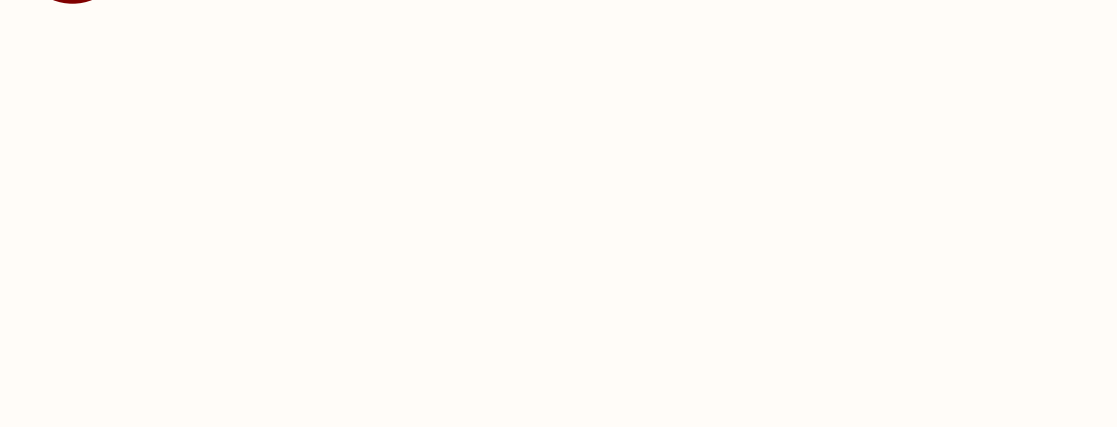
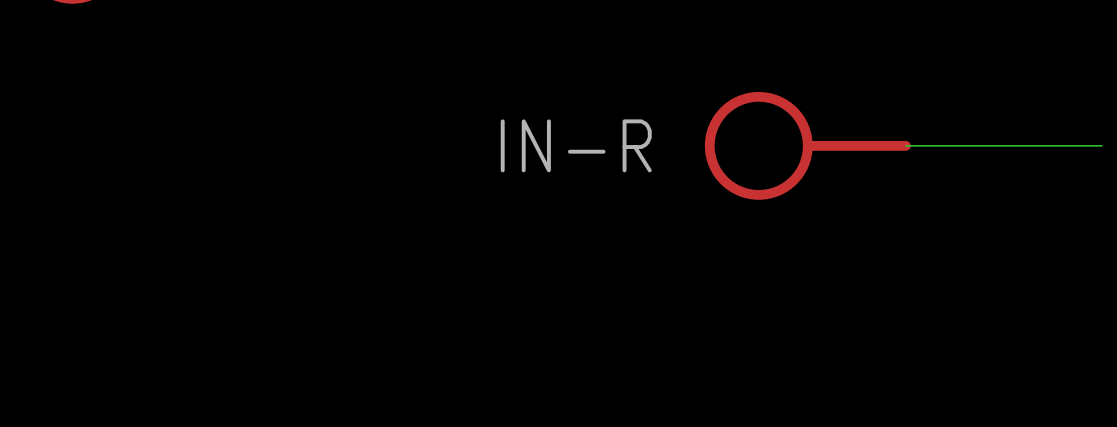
IN-R: none -> (807, 145)
wire: none -> (905, 145) (1101, 145)

